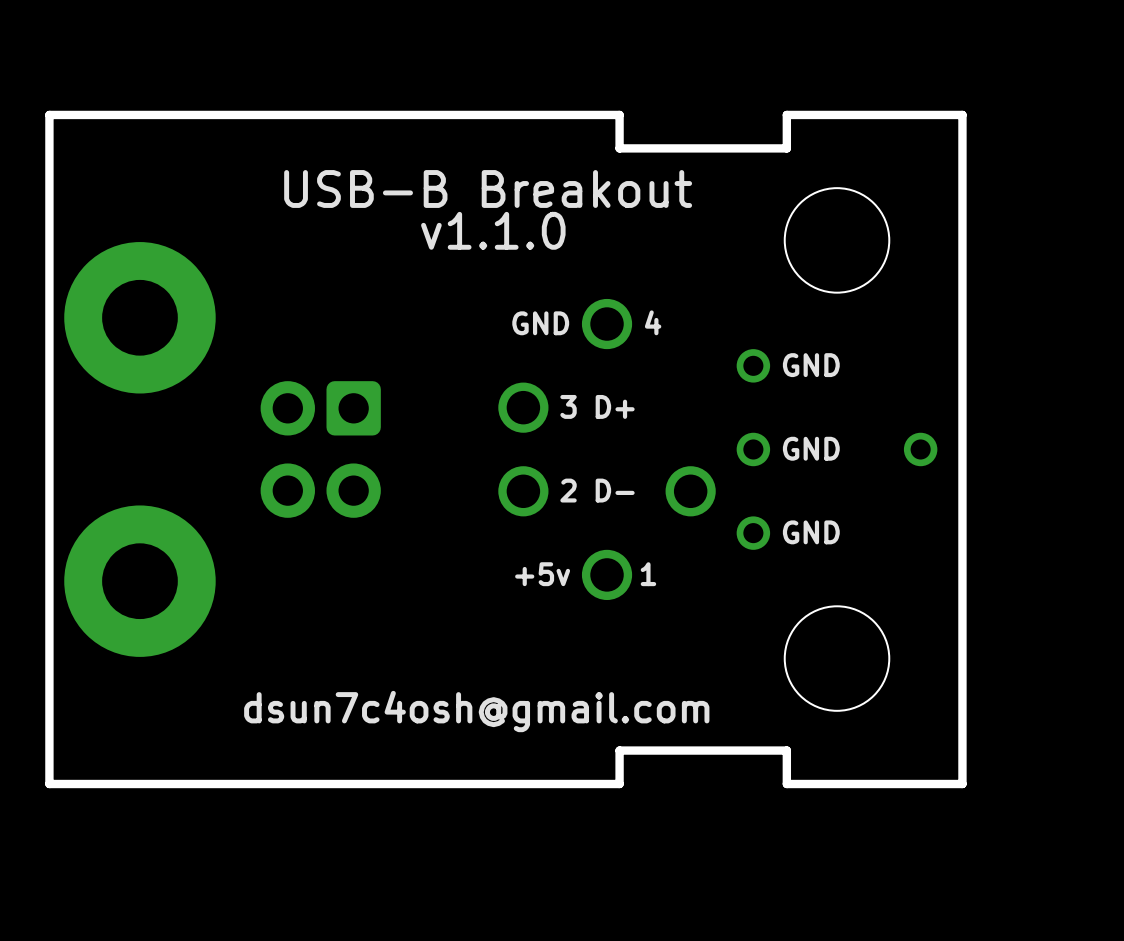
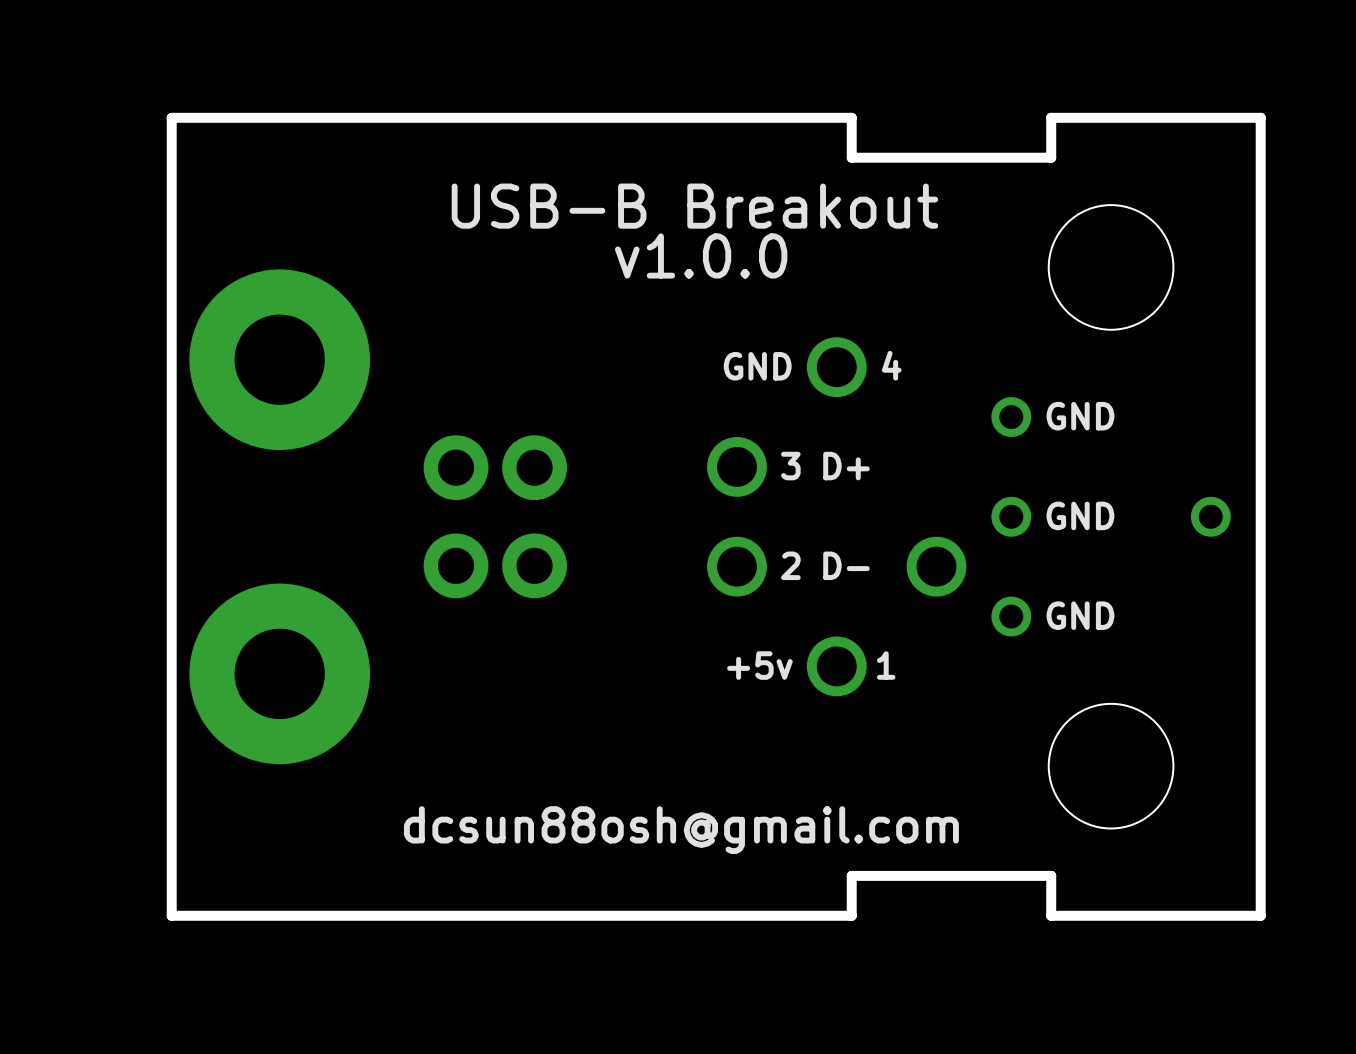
text: v1.1.0 (493, 230) -> v1.0.0 (701, 255)
part footprint: [64, 242, 381, 657] -> [189, 269, 568, 765]
text: dsun7c4osh@gmail.com (476, 711) -> dcsun88osh@gmail.com (681, 830)

